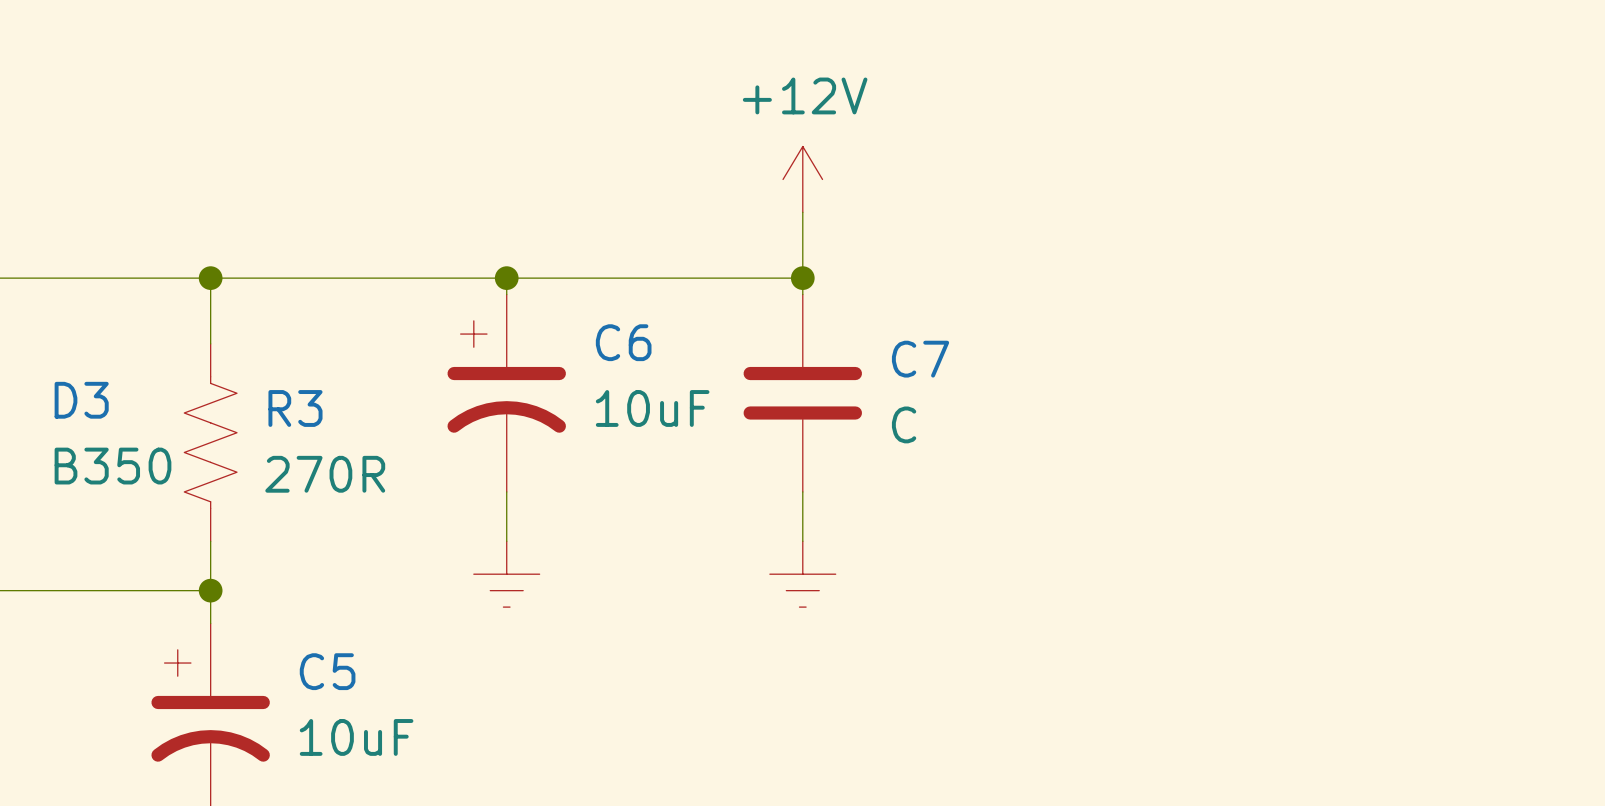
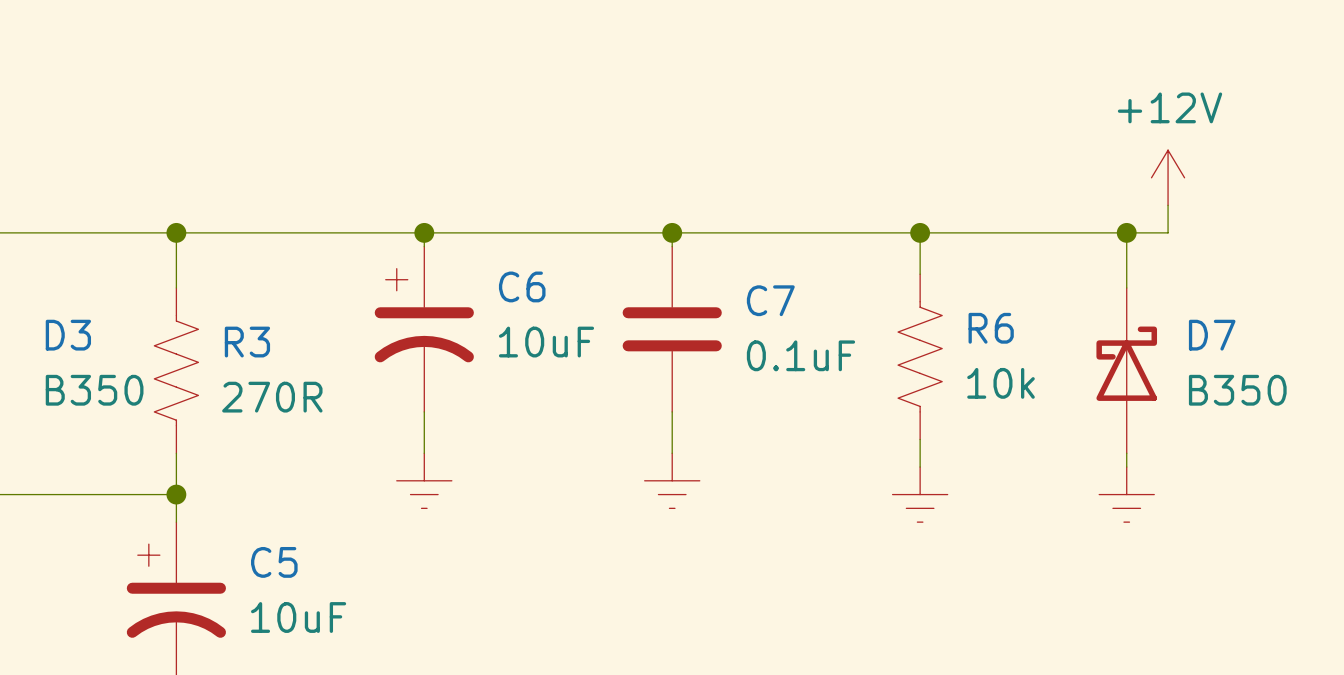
power symbol position: +12V (802, 179) -> +12V (1168, 177)
wire: (802, 212) (802, 278) -> (1168, 205) (1168, 232) (672, 232)
wire: none -> (920, 232) (920, 274)
junction: none -> (920, 232)
wire: none -> (1126, 232) (1126, 287)
junction: none -> (1126, 232)
C7 value: C (904, 424) -> 0.1uF (800, 355)
R6: none -> 10k (920, 356)
D7: none -> B350 (1126, 370)
wire: none -> (920, 439) (920, 467)
wire: none -> (1126, 453) (1126, 467)
power symbol: none -> (920, 494)
power symbol: none -> (1126, 494)

